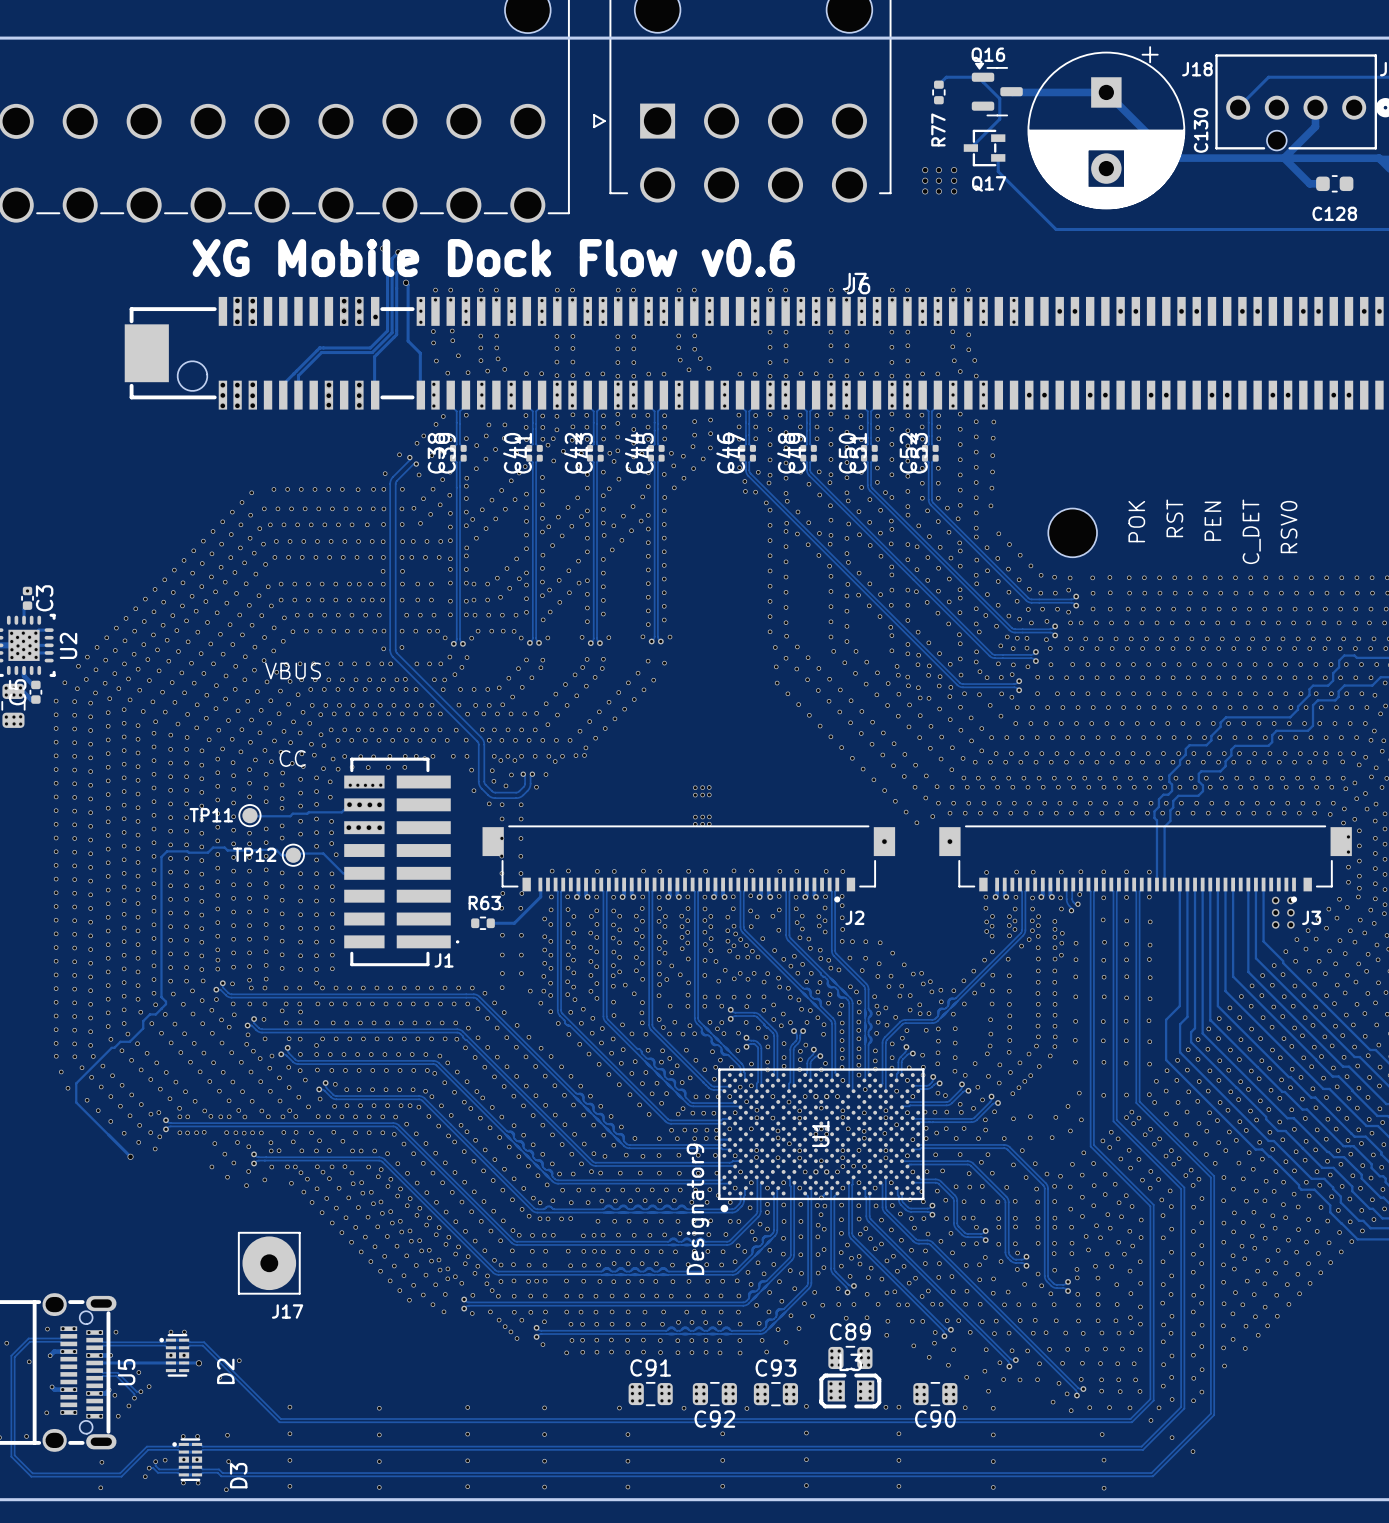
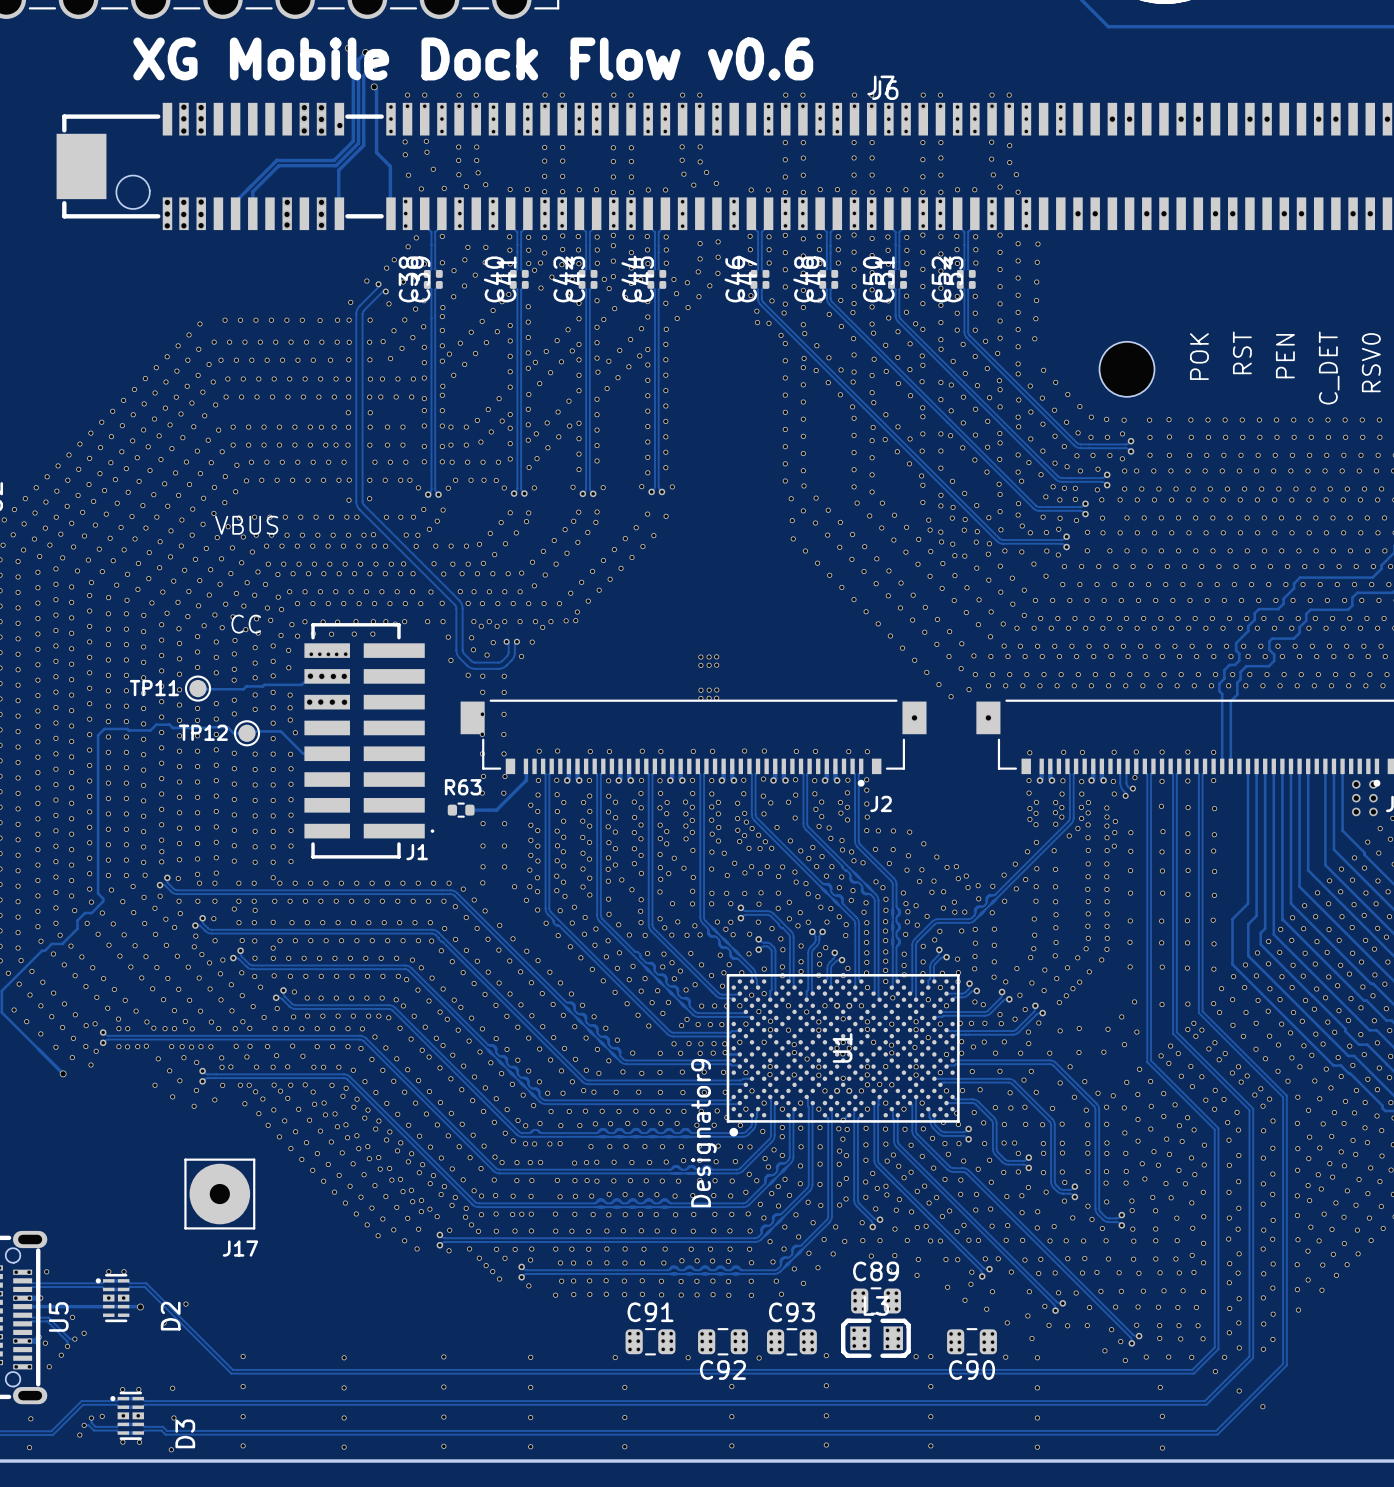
via: none -> (778, 1186)

